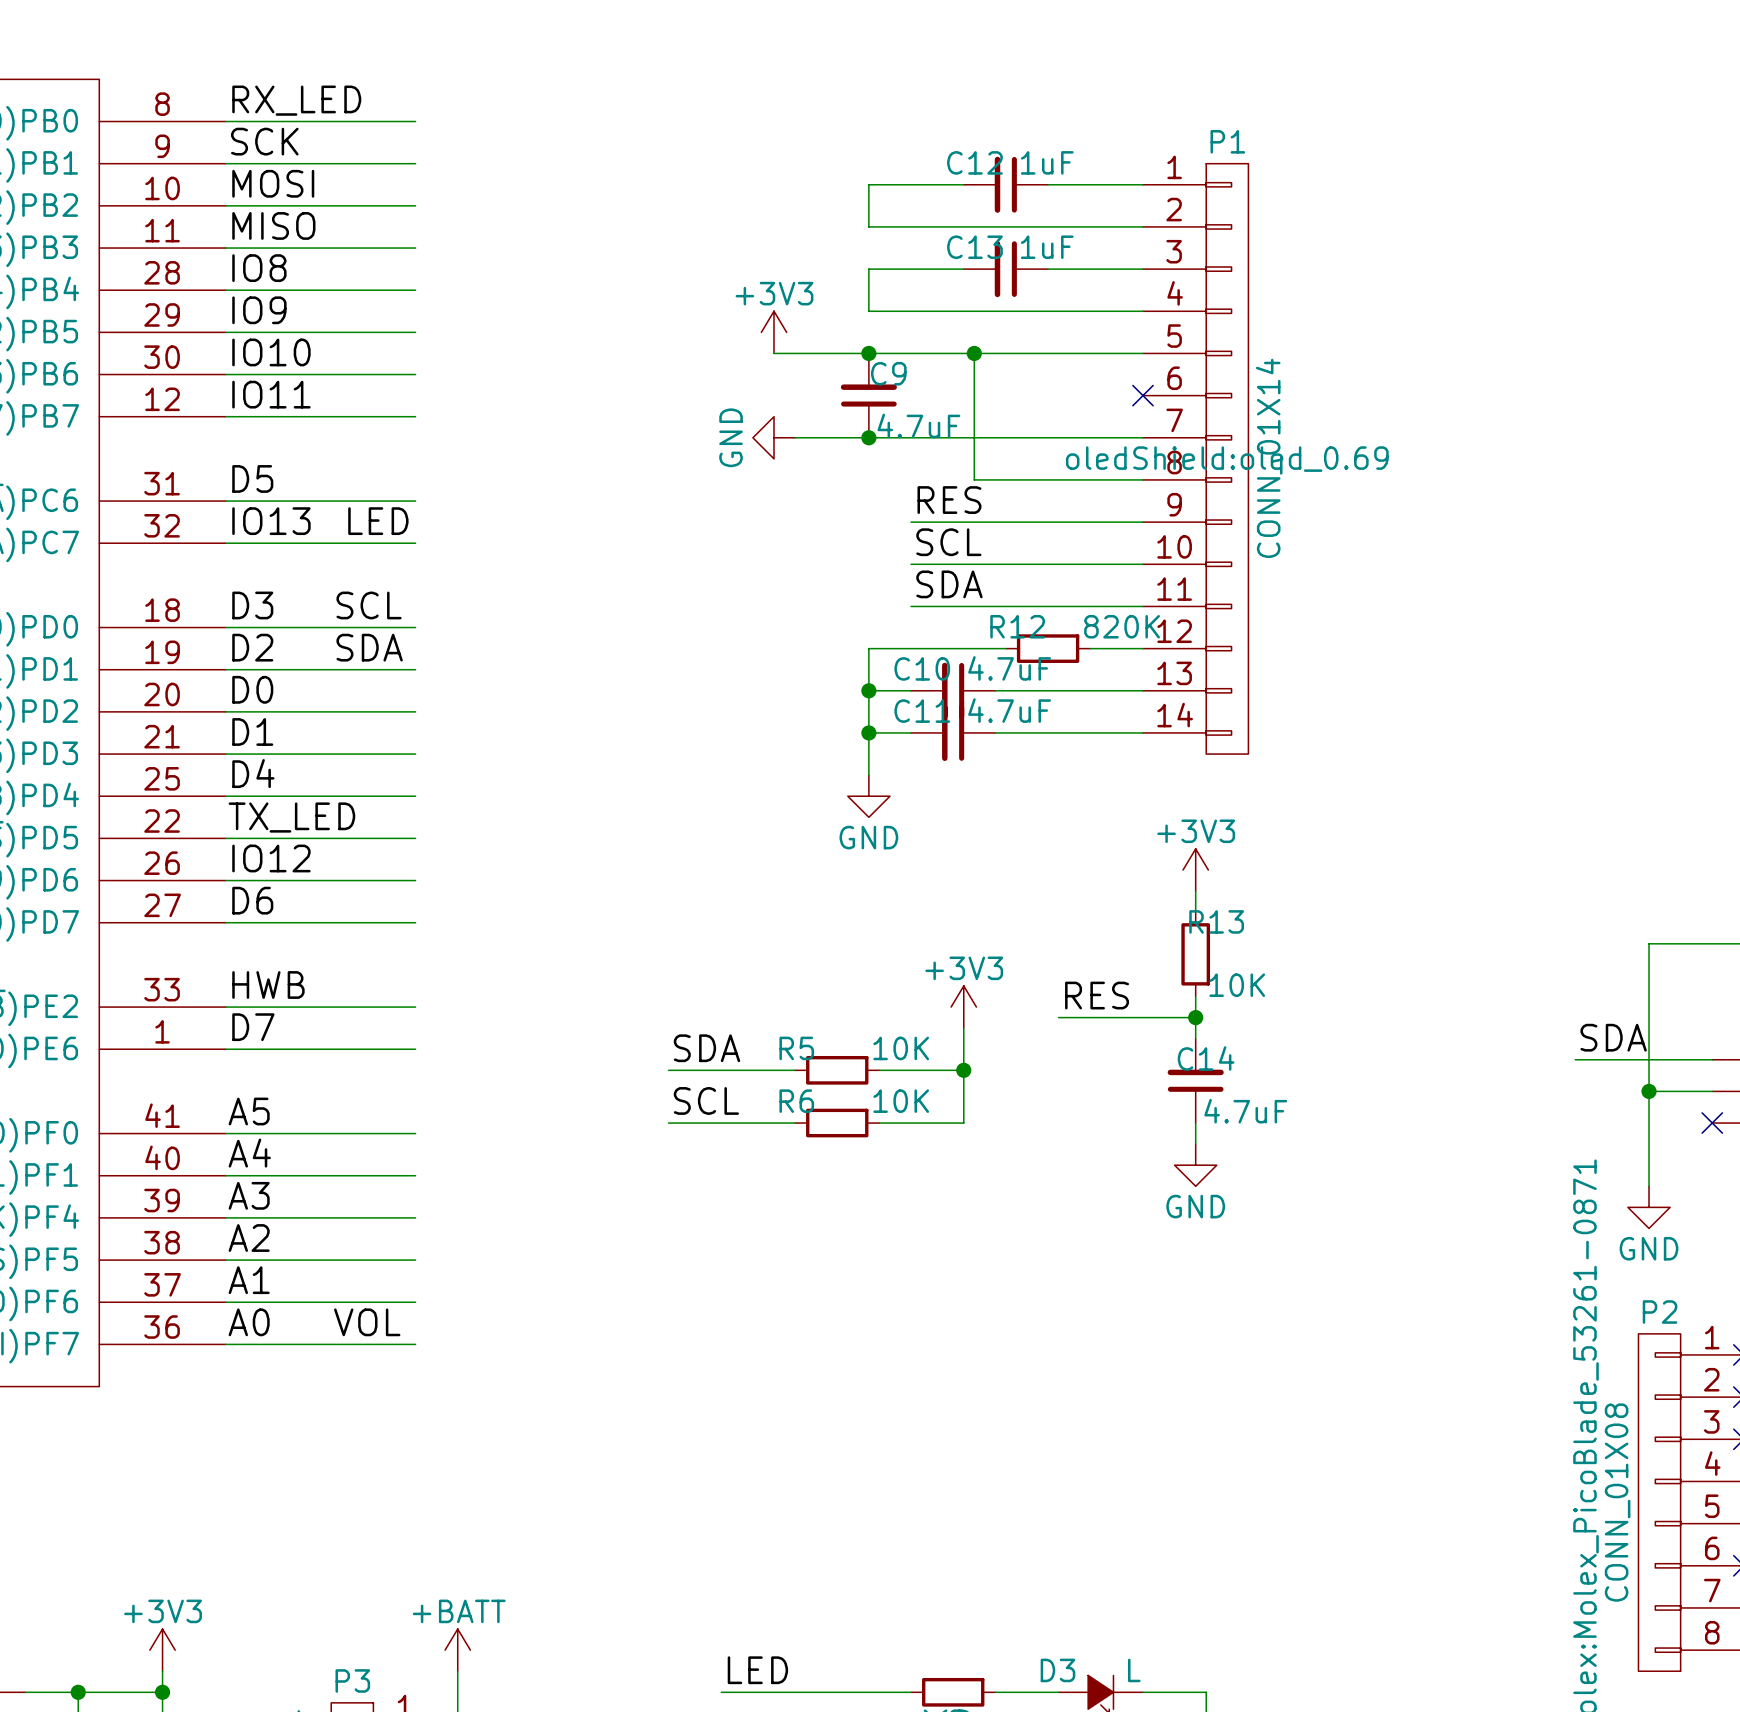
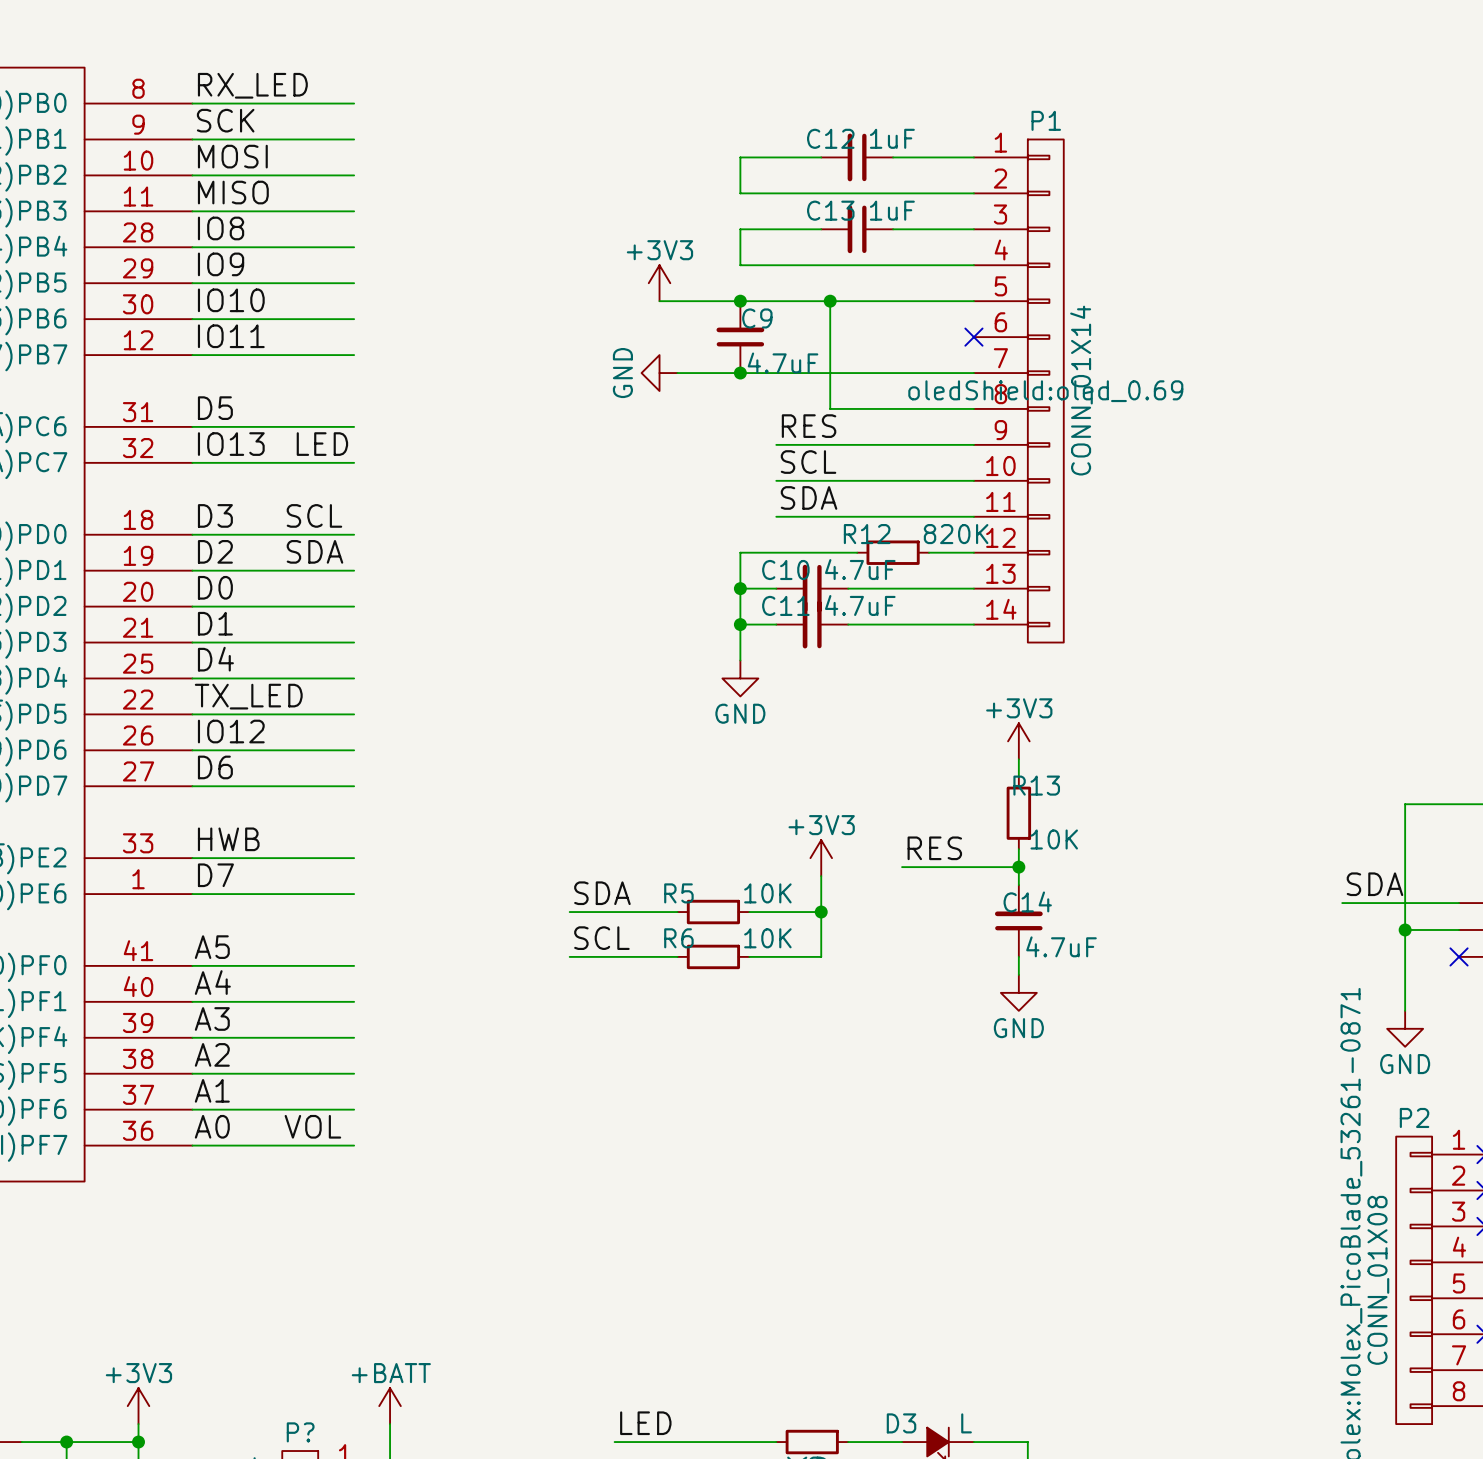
P3 name: P3 (352, 1680) -> P? (300, 1432)

